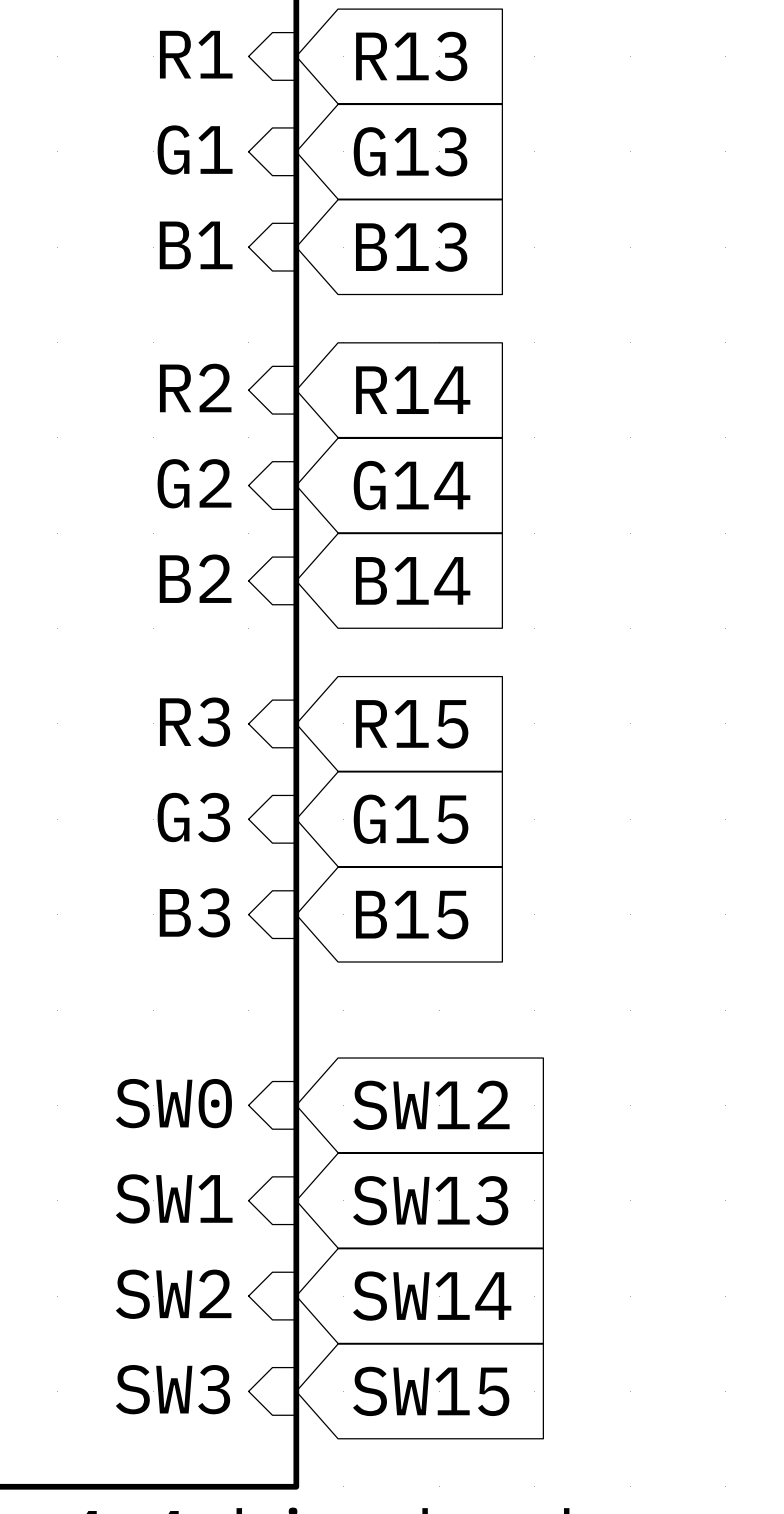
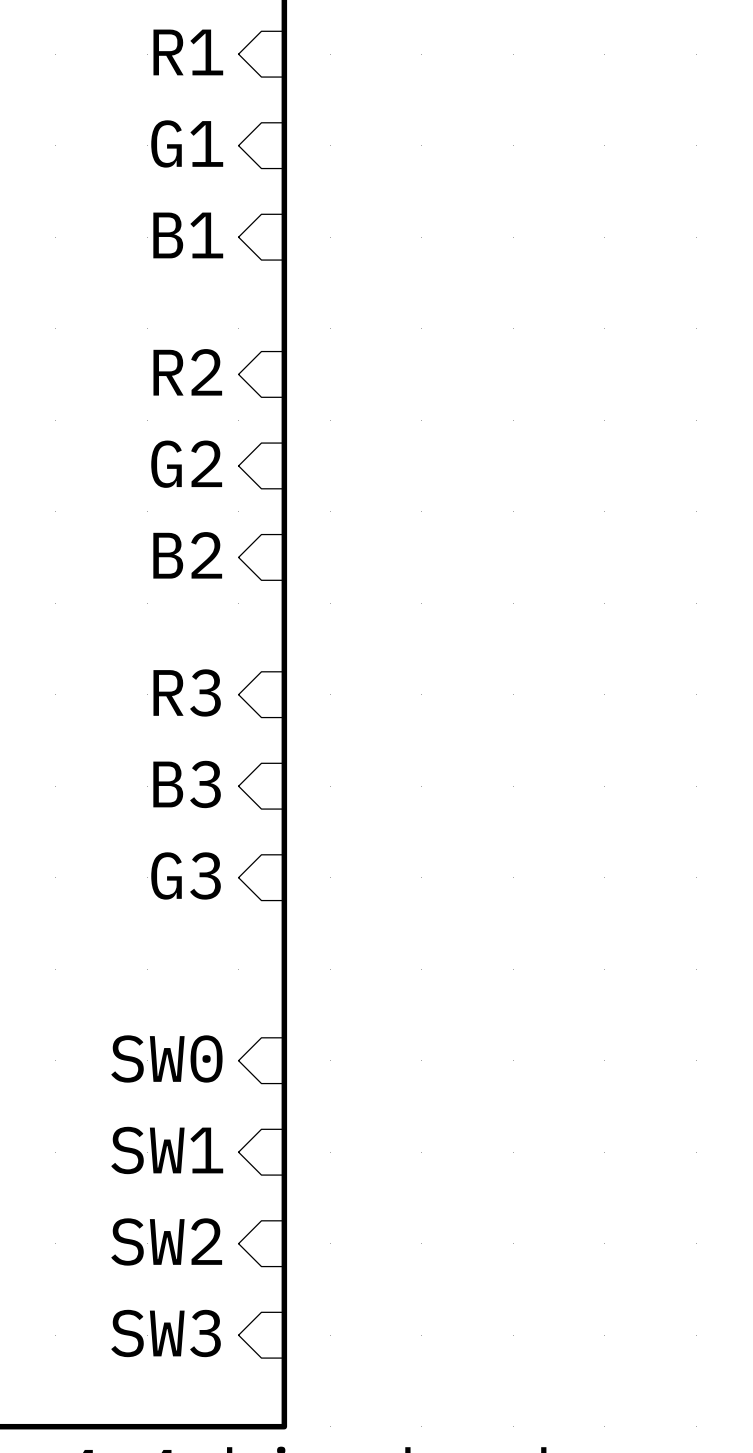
global label: R13 (411, 56) -> none
global label: G13 (410, 151) -> none
global label: B13 (411, 247) -> none
global label: R14 (413, 390) -> none
global label: G14 (412, 485) -> none
global label: B14 (413, 580) -> none
global label: R15 (412, 724) -> none
sheet pin: G3 (193, 817) -> B3 (187, 784)
global label: G15 (411, 819) -> none
sheet pin: B3 (194, 912) -> G3 (186, 875)
global label: B15 (412, 915) -> none
global label: SW12 (431, 1105) -> none
global label: SW13 (430, 1200) -> none
global label: SW14 (432, 1296) -> none
global label: SW15 (431, 1391) -> none

